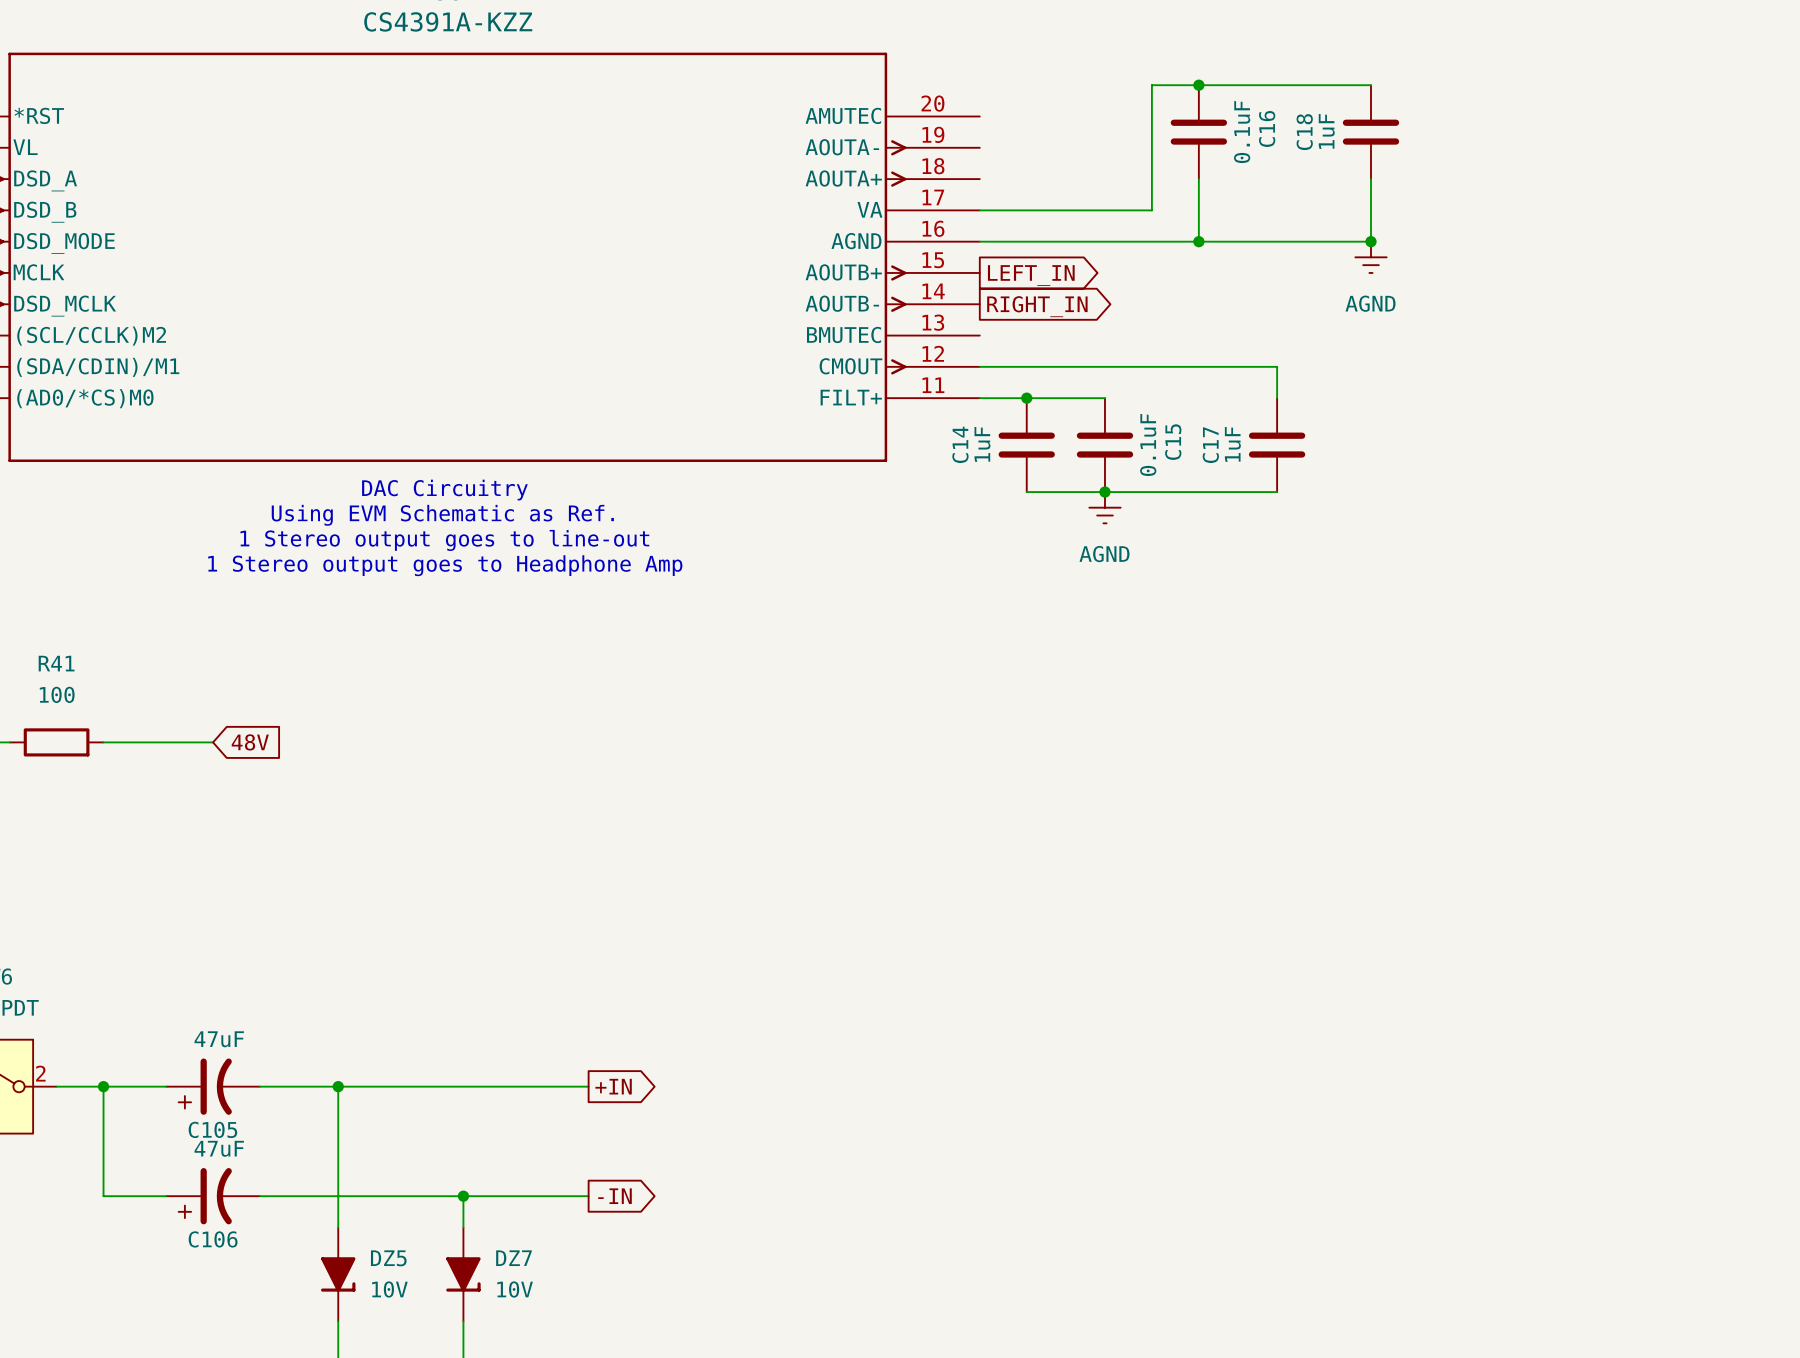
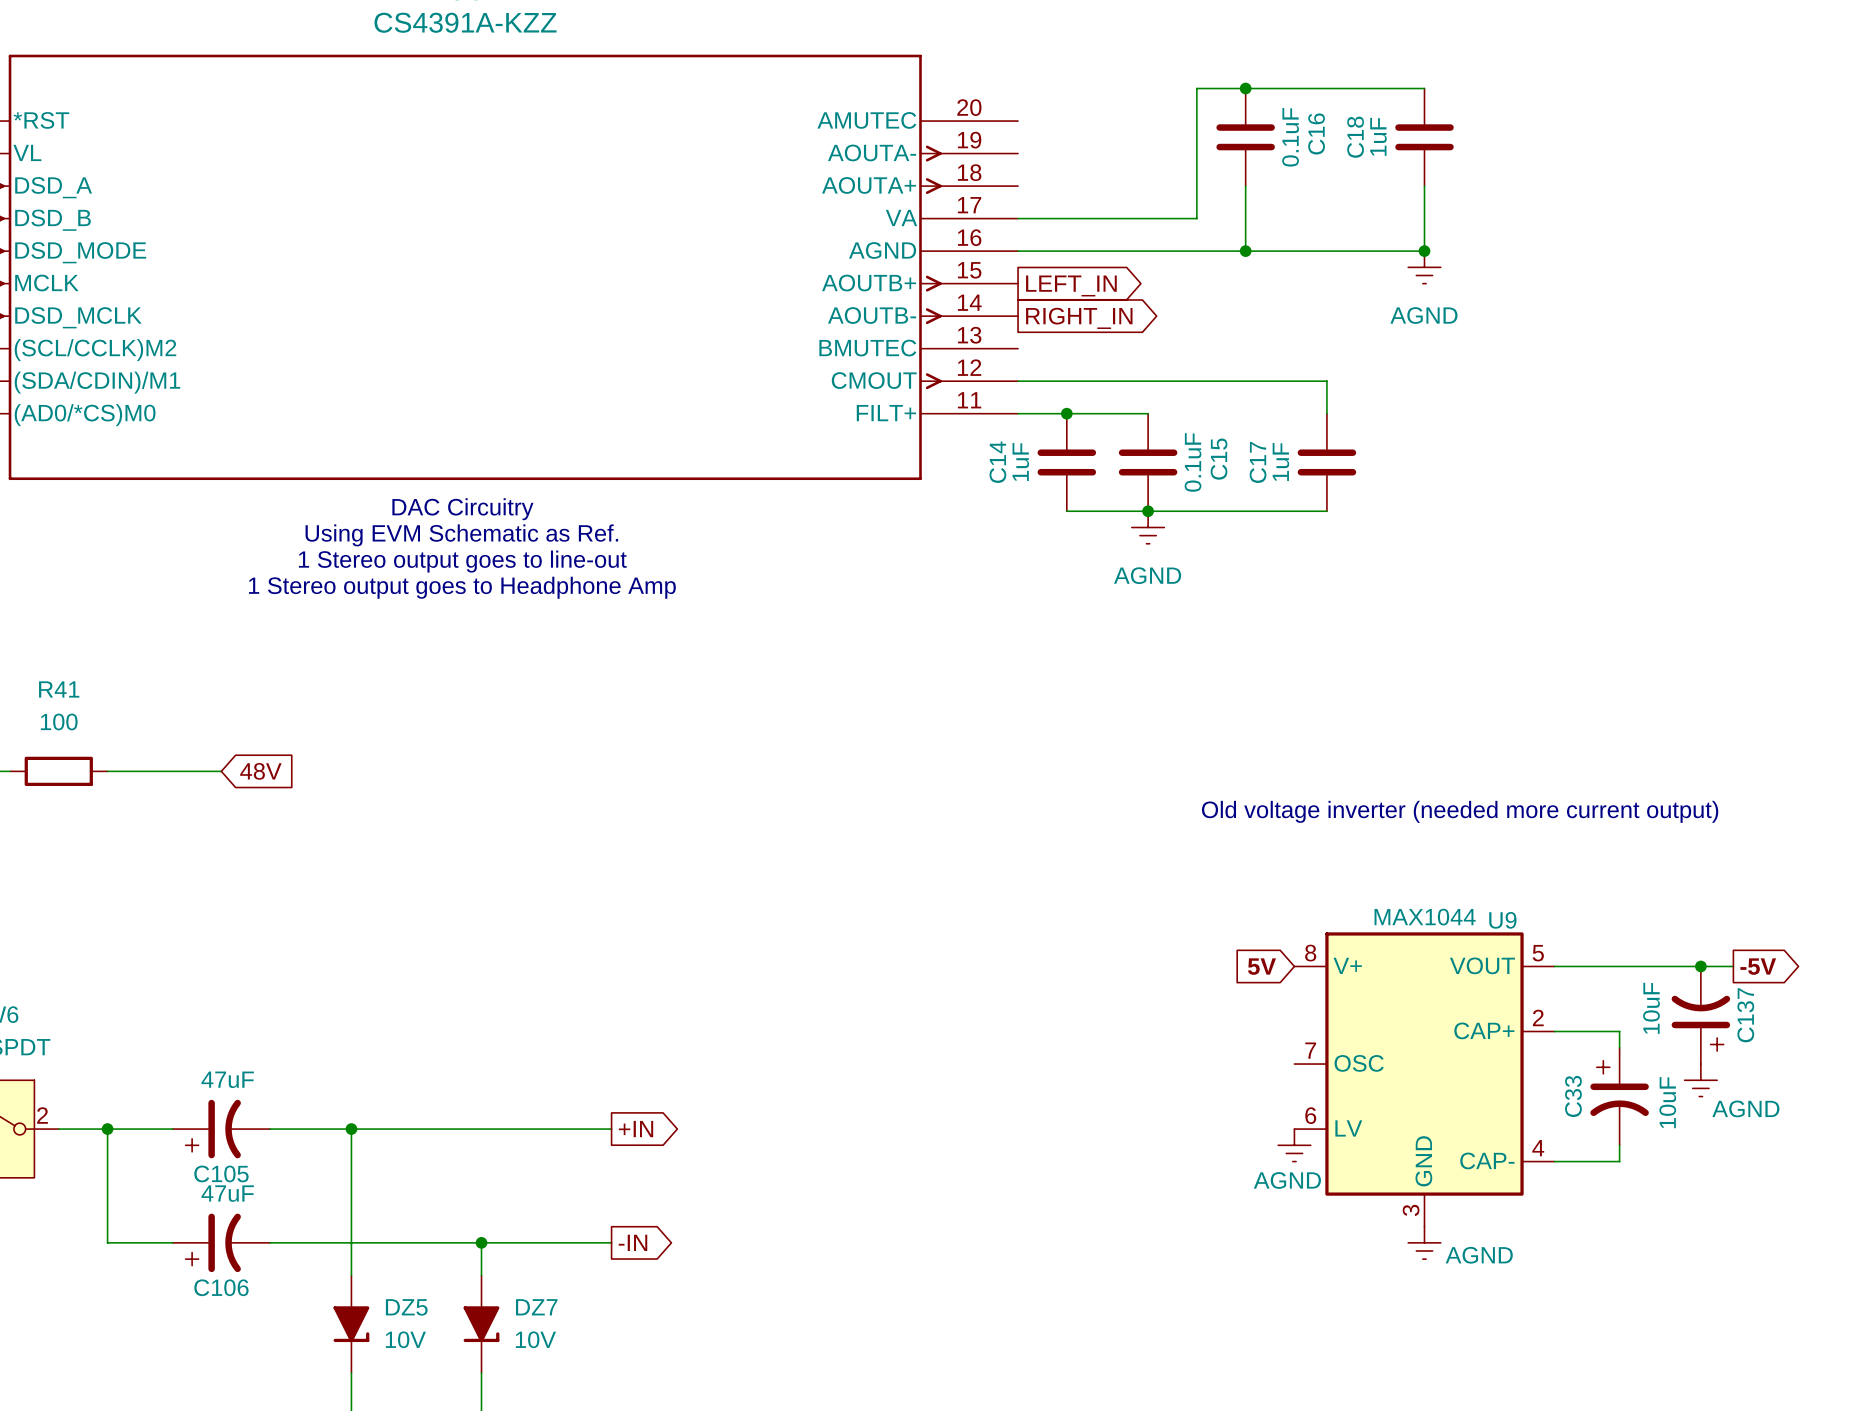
text: none -> Old voltage inverter (needed more current output) (1460, 811)
global label: none -> 5V (1261, 966)
wire: none -> (1554, 966) (1733, 966)
junction: none -> (1700, 966)
global label: none -> -5V (1758, 966)
C137: none -> 10uF (1700, 1015)
wire: none -> (1554, 1031) (1619, 1031) (1619, 1047)
U9: none -> MAX1044 (1424, 1079)
power symbol: none -> AGND (1700, 1080)
C33: none -> 10uF (1619, 1096)
power symbol: none -> AGND (1294, 1145)
wire: none -> (1619, 1145) (1619, 1161) (1554, 1161)
power symbol: none -> AGND (1424, 1242)

